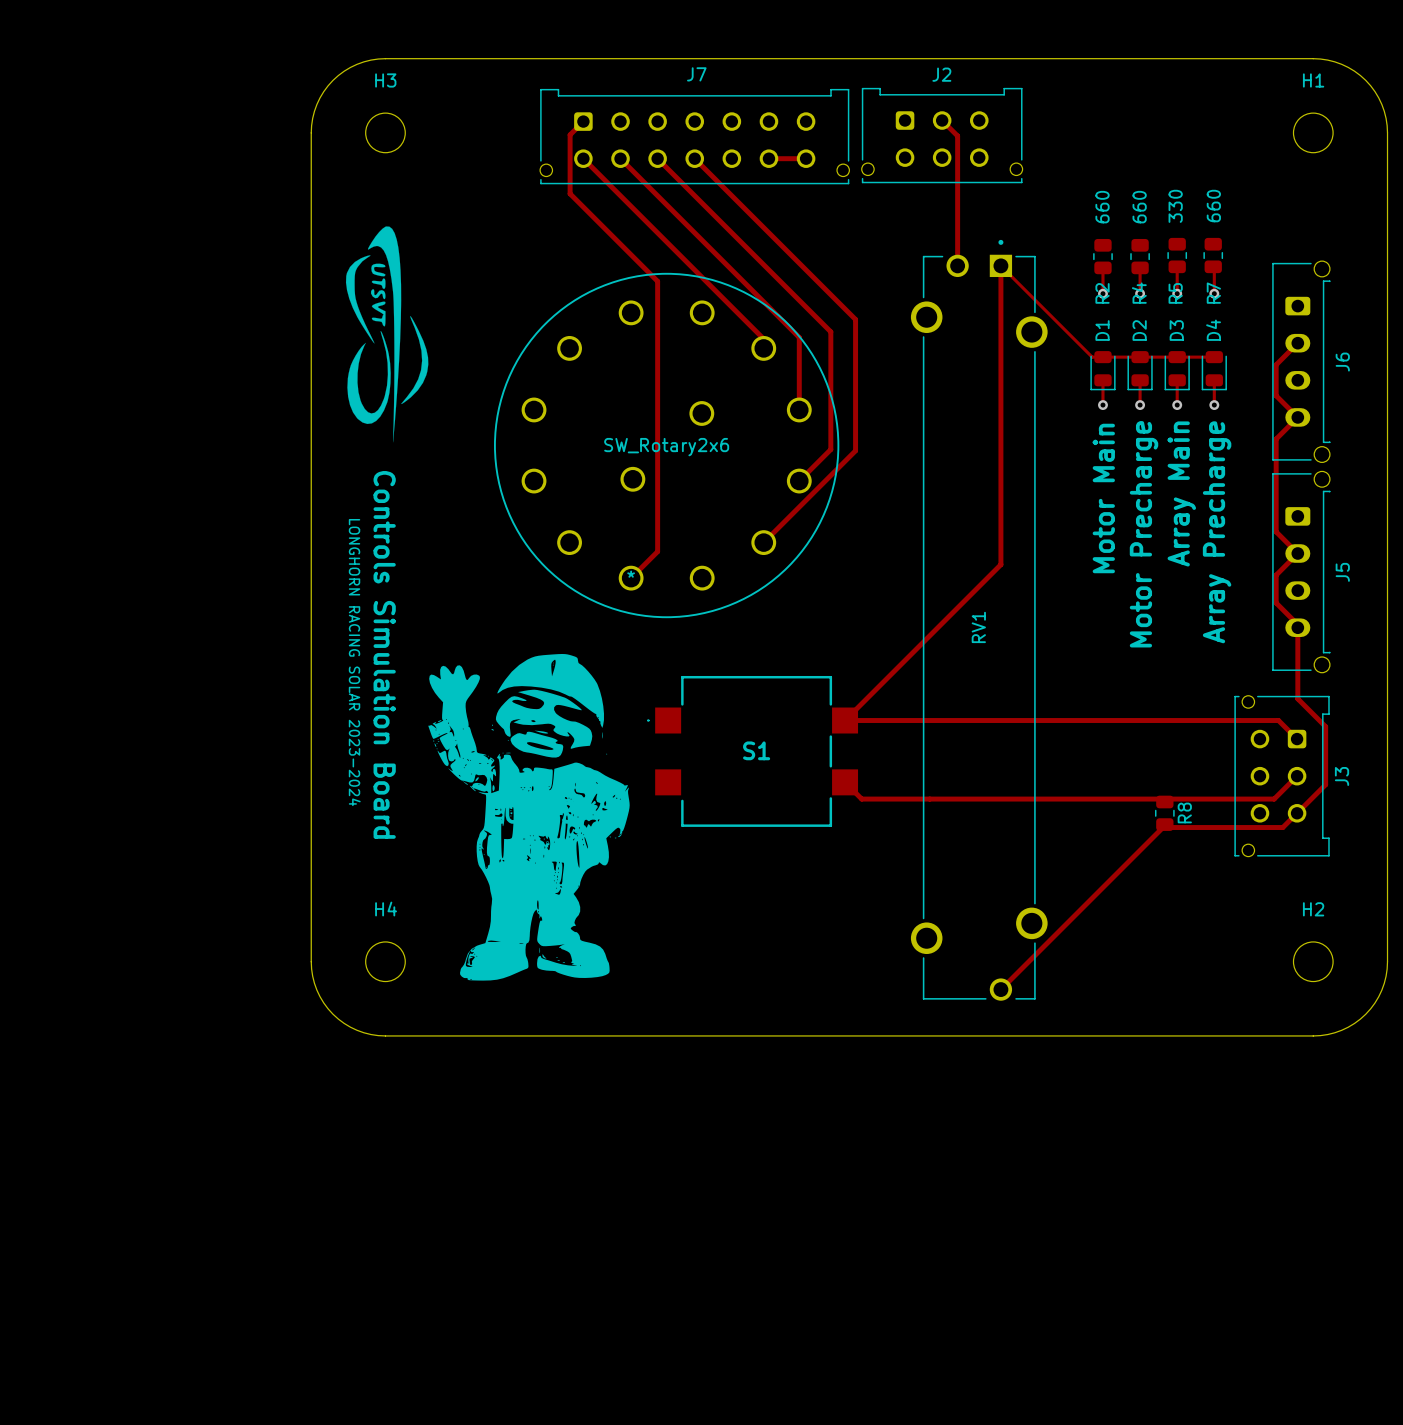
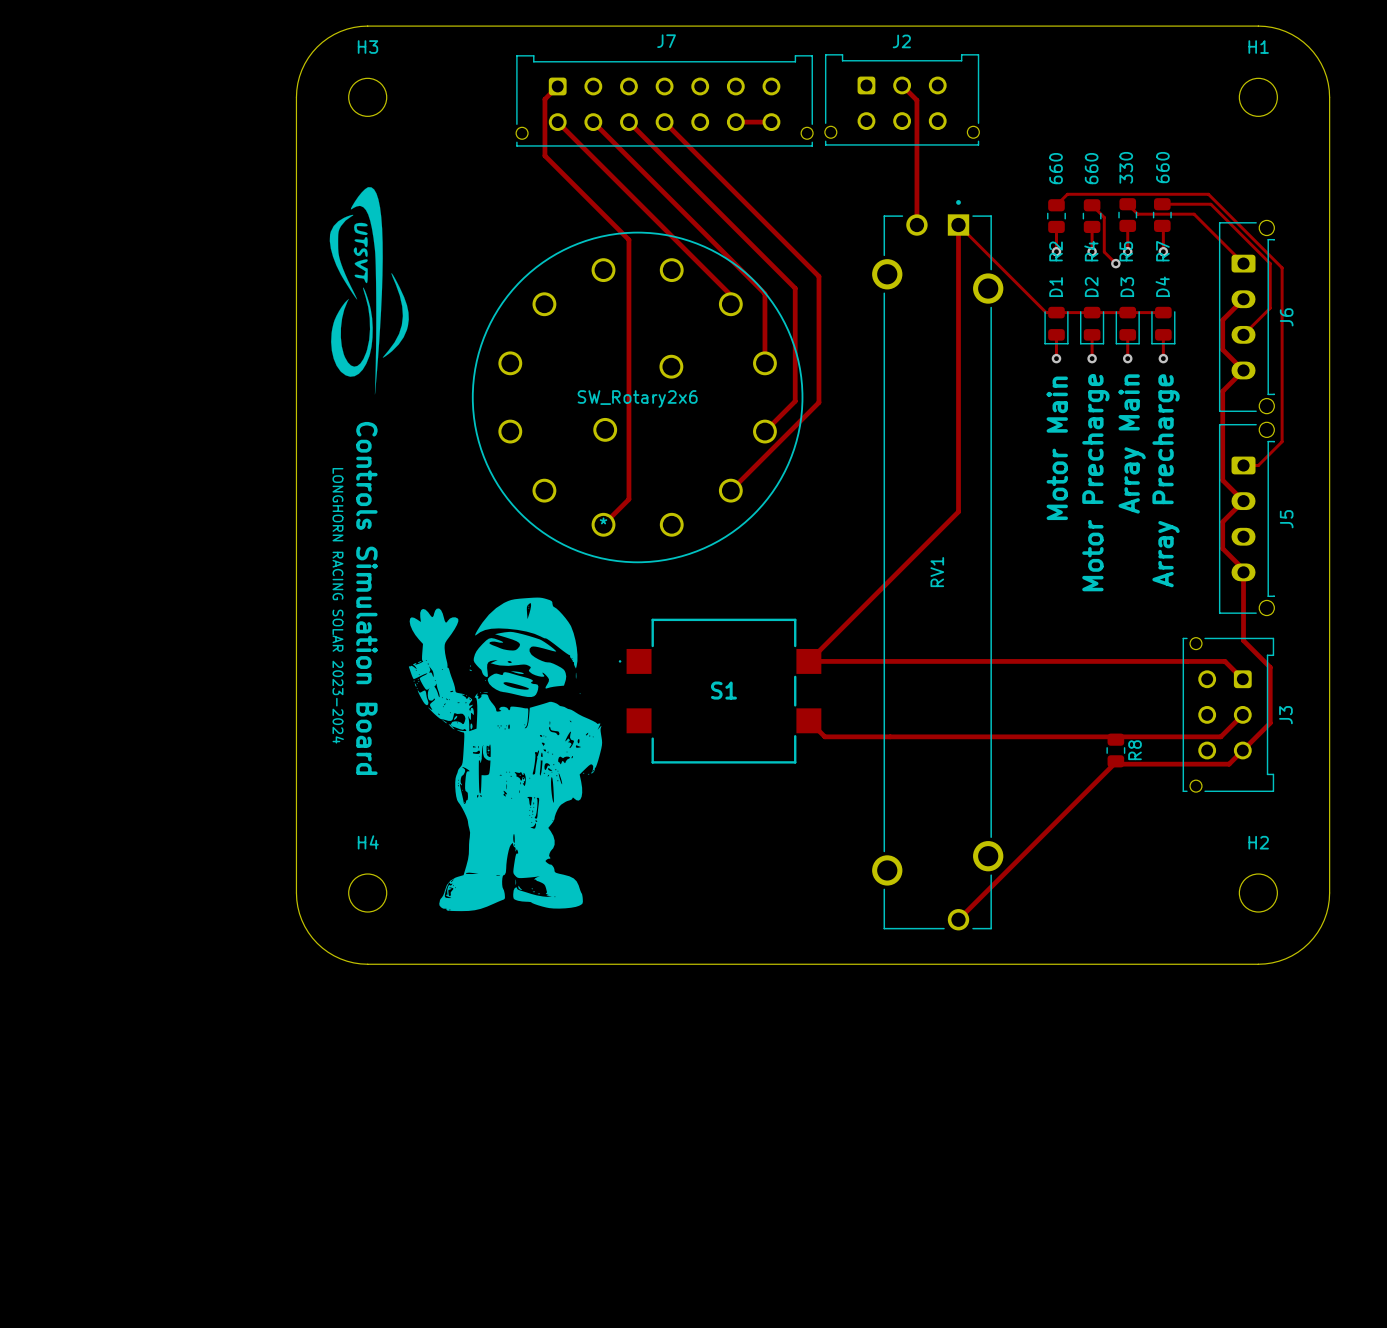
track: none -> (1127, 204) (1137, 214) (1194, 214) (1243, 263)
track: none -> (1162, 204) (1210, 204) (1270, 263) (1270, 308) (1243, 334)
track: none -> (1056, 205) (1067, 194) (1208, 194) (1282, 267) (1282, 441) (1258, 465) (1243, 465)
track: none -> (1092, 205) (1104, 217) (1104, 252) (1115, 263)
via: none -> (1115, 263)

